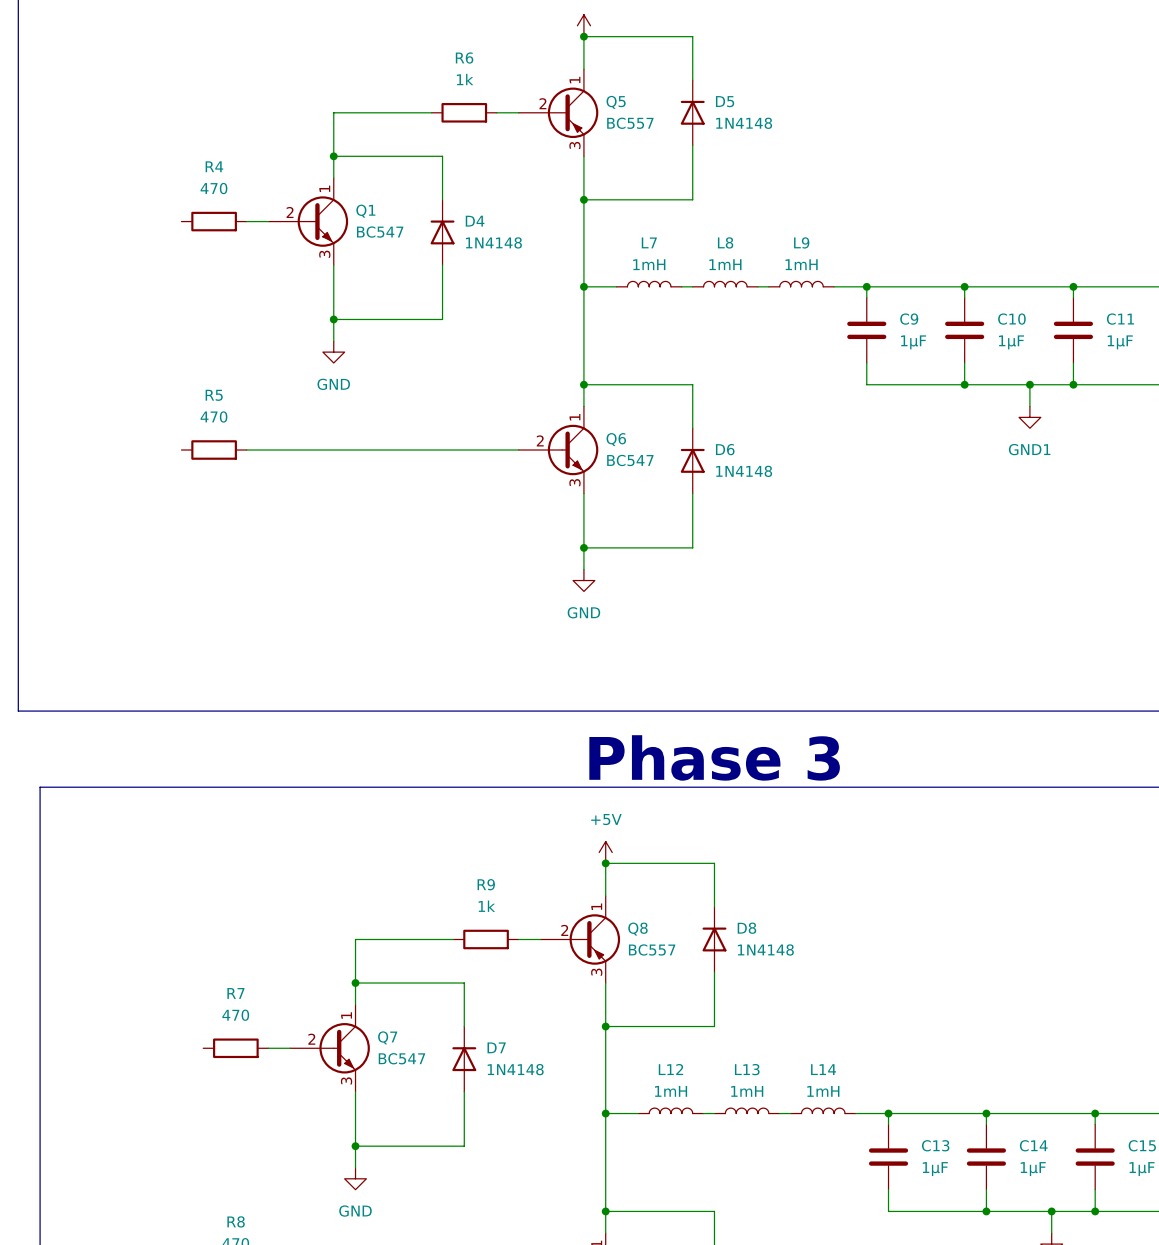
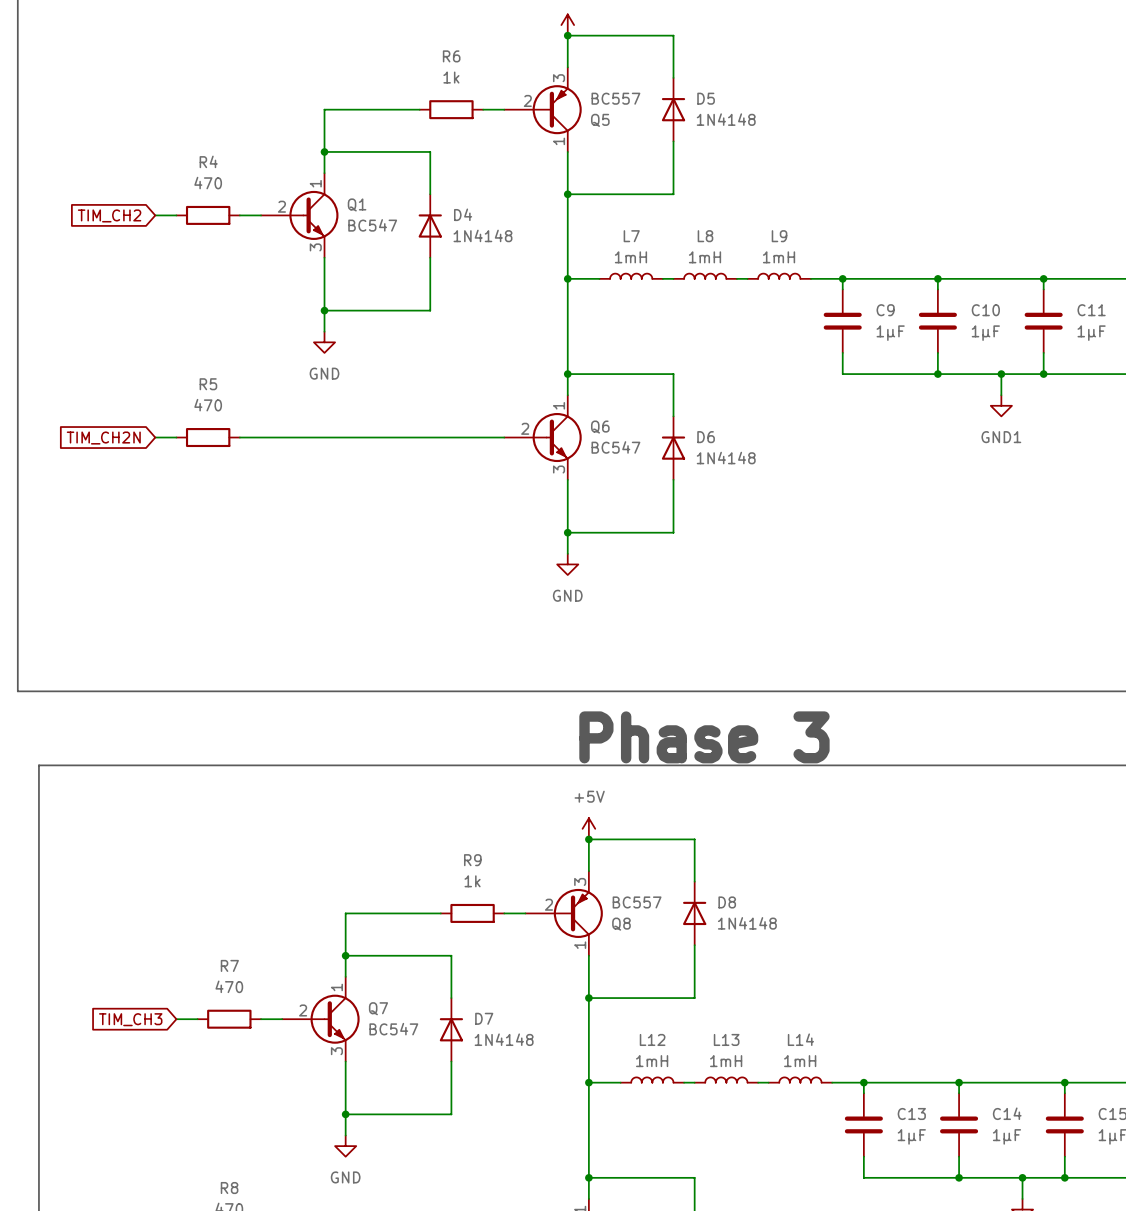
Q5 flip: as is (573, 112) -> up-down (557, 109)
wire: none -> (155, 215) (176, 215)
global label: none -> TIM_CH2 (109, 215)
wire: none -> (155, 437) (176, 437)
global label: none -> TIM_CH2N (103, 438)
Q8 flip: as is (594, 939) -> up-down (578, 913)
wire: none -> (176, 1019) (197, 1019)
global label: none -> TIM_CH3 (130, 1019)

